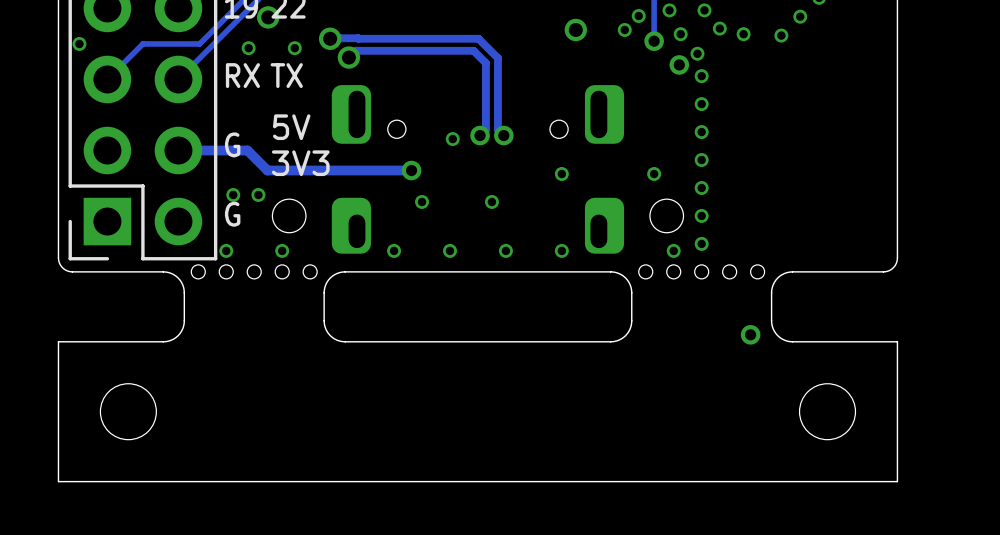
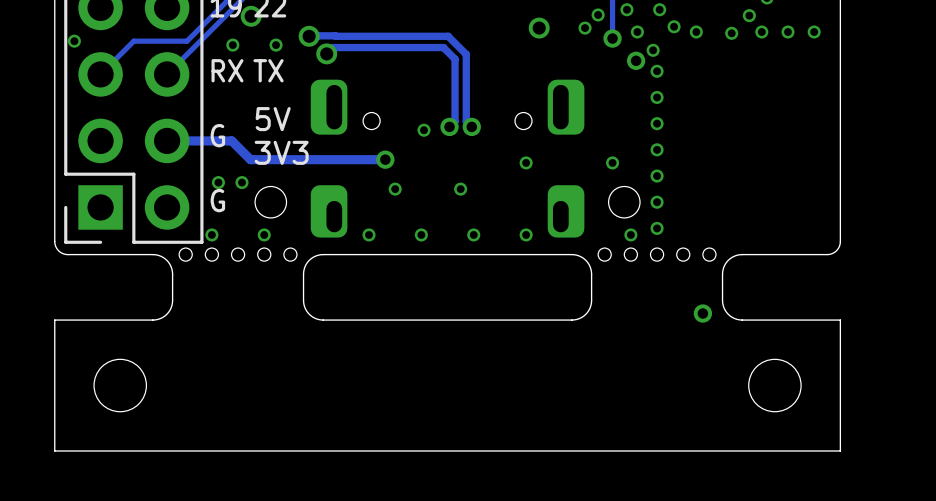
via: none -> (761, 32)
via: none -> (787, 32)
via: none -> (814, 32)

